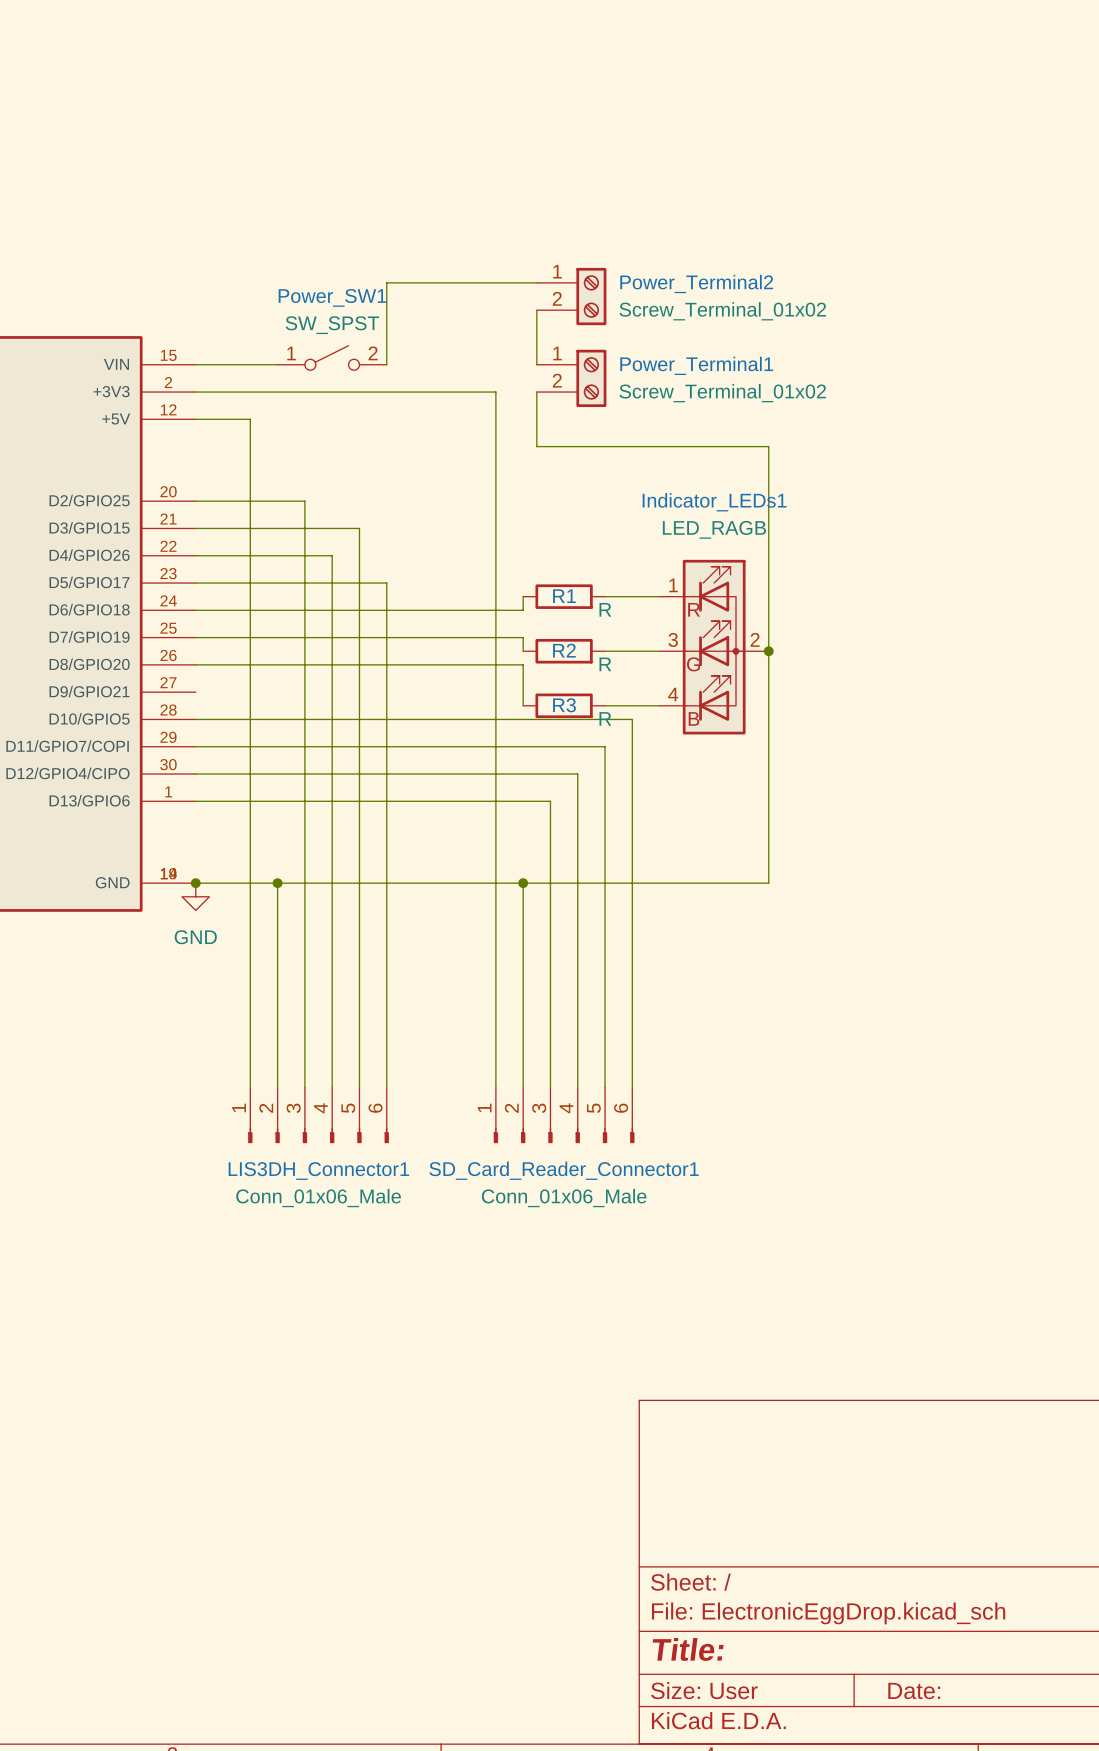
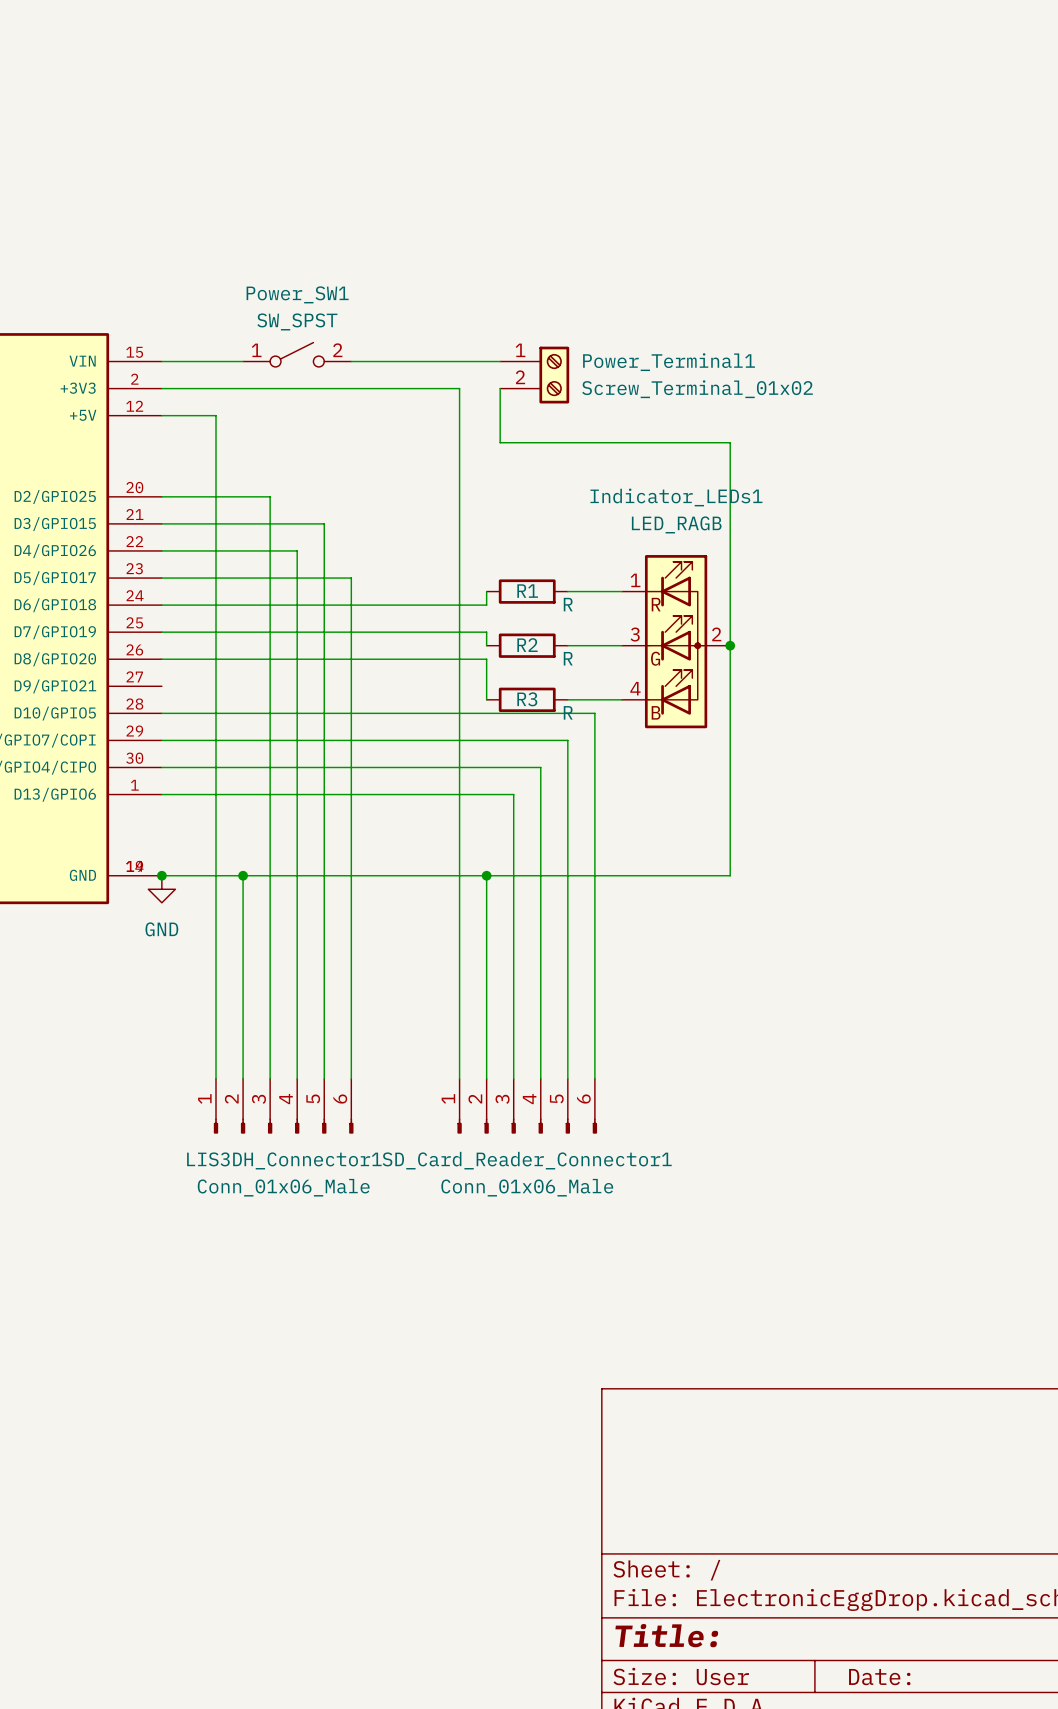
wire: (536, 282) (386, 282) (386, 364) -> (500, 361) (351, 361)
Power_Terminal2: Screw_Terminal_01x02 (571, 296) -> none
wire: (536, 310) (536, 364) -> none

